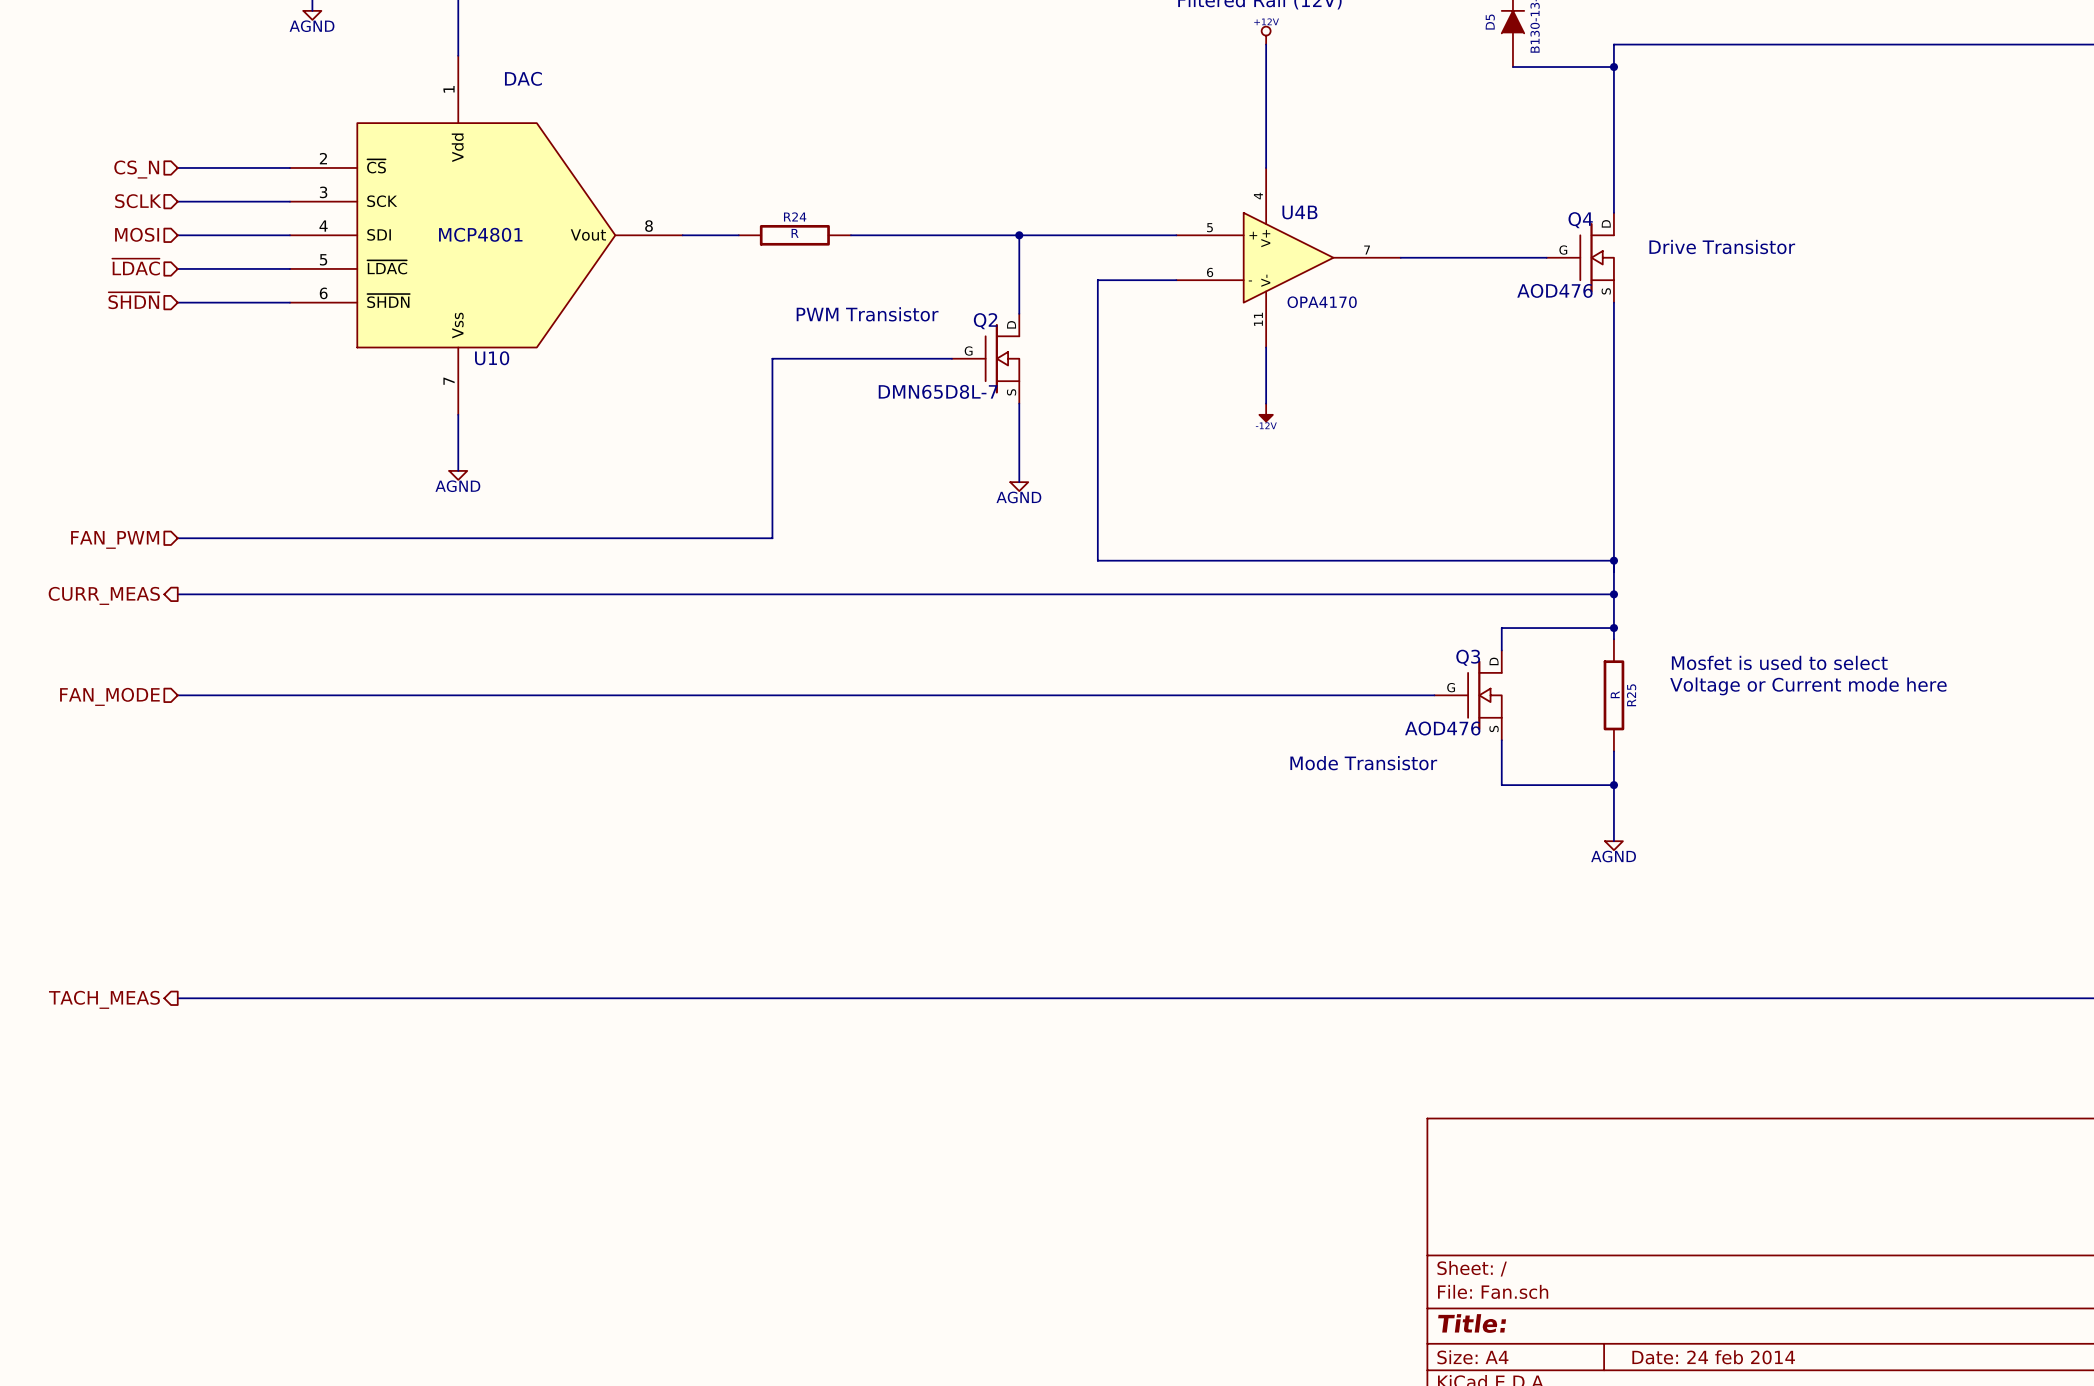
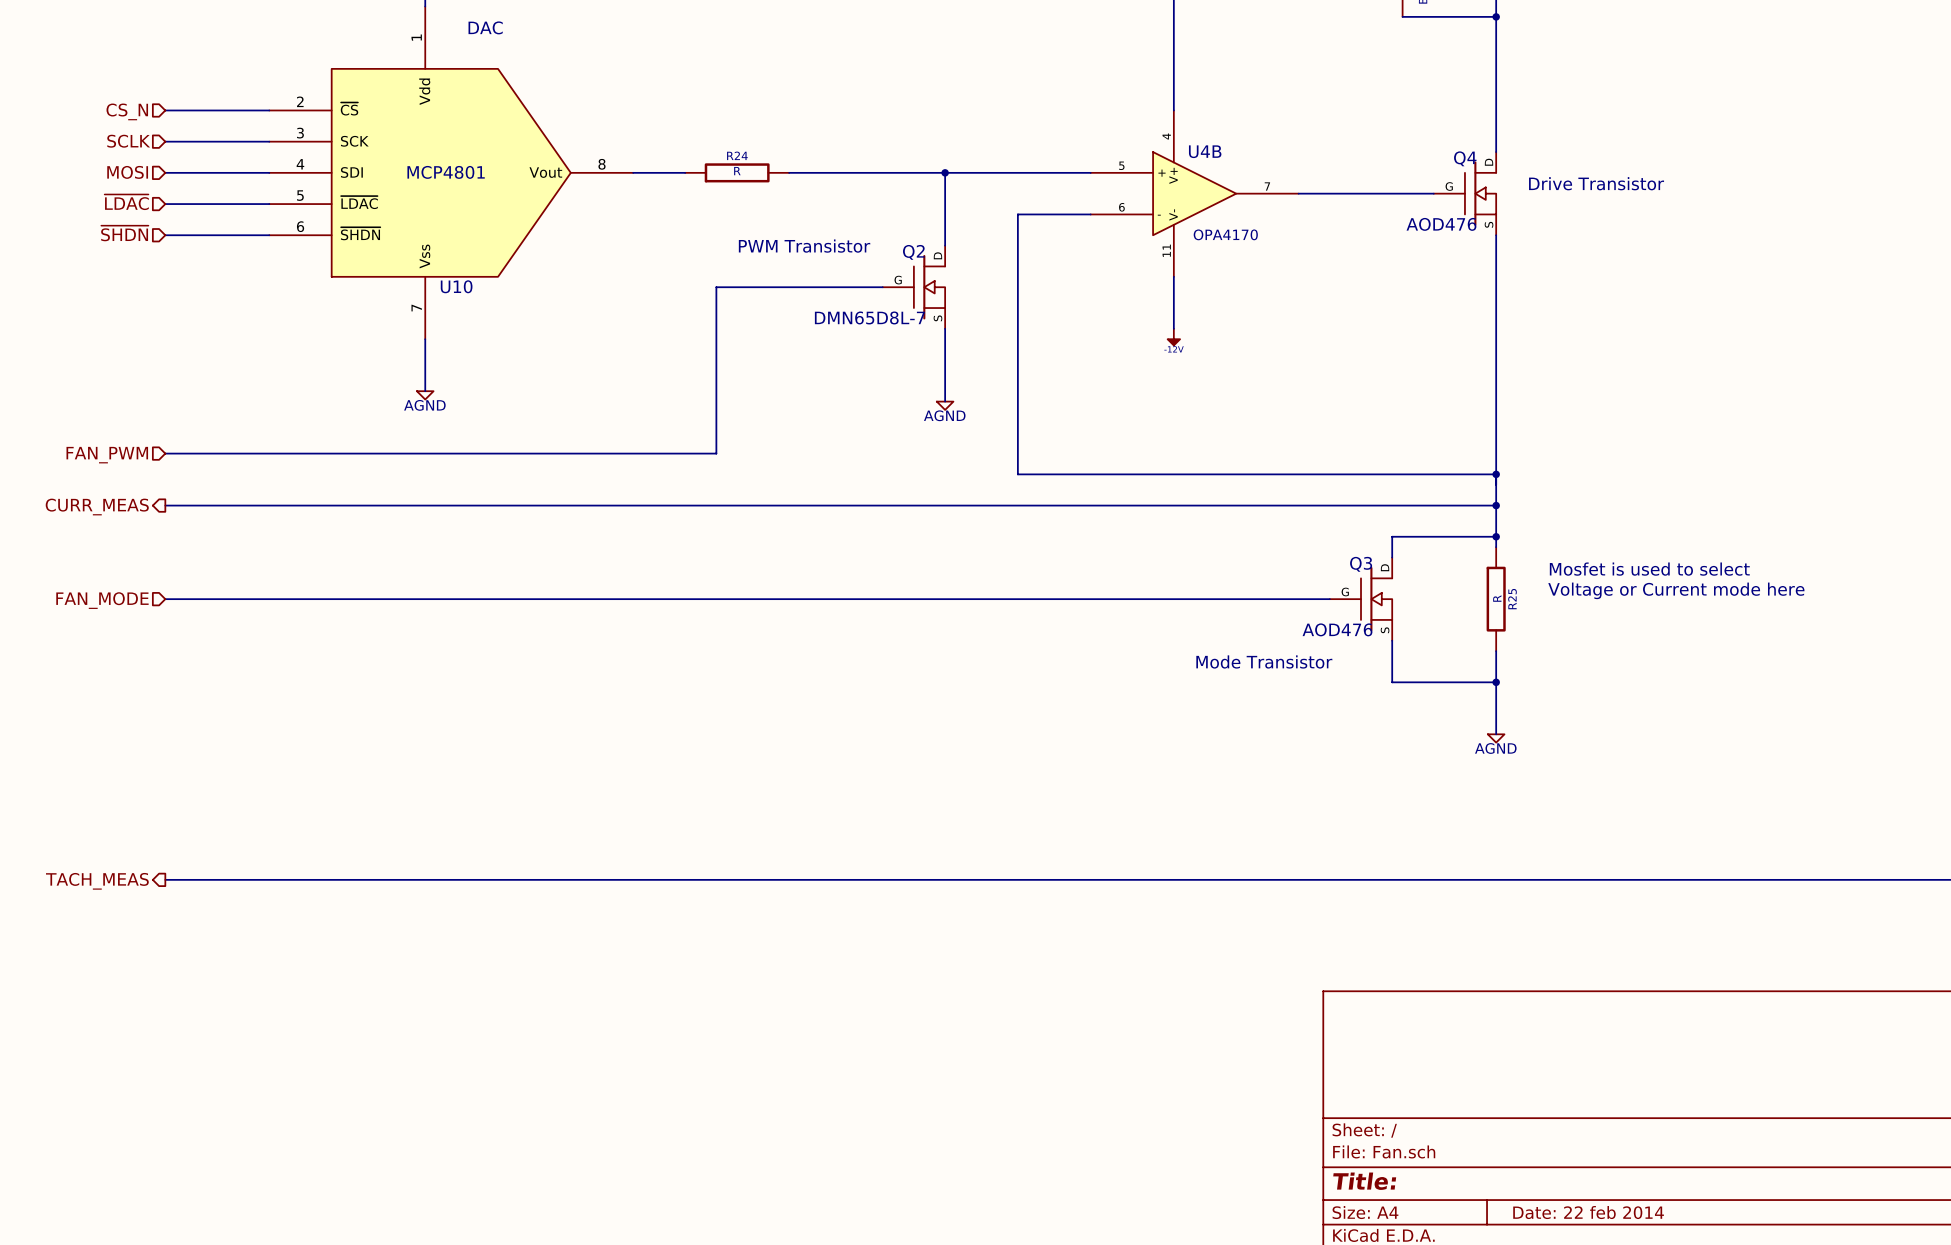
title block: Date: 24 feb 2014 (1713, 1357) -> Date: 22 feb 2014 (1588, 1212)

